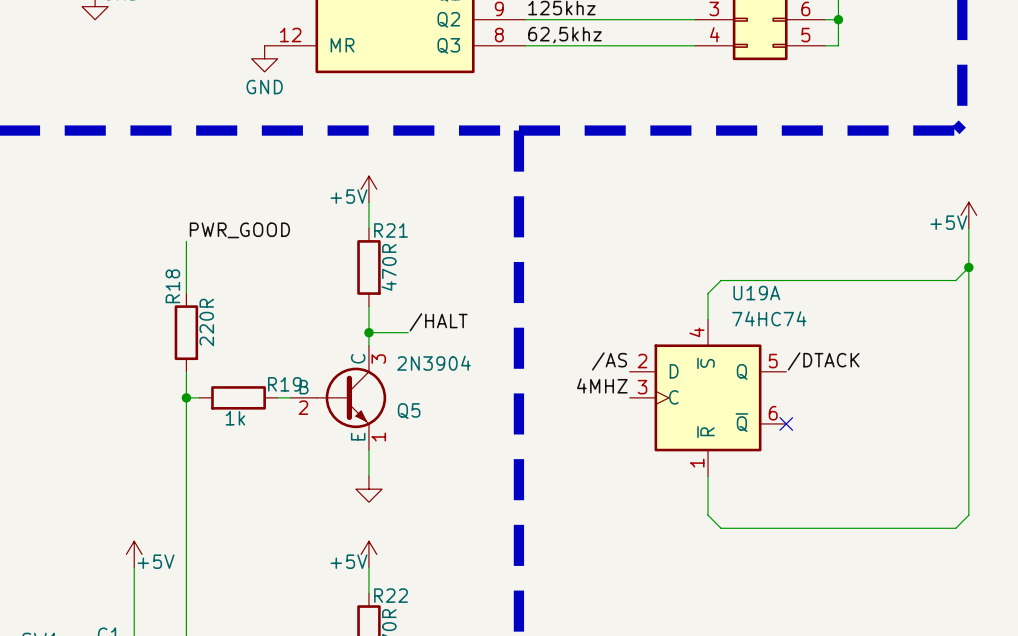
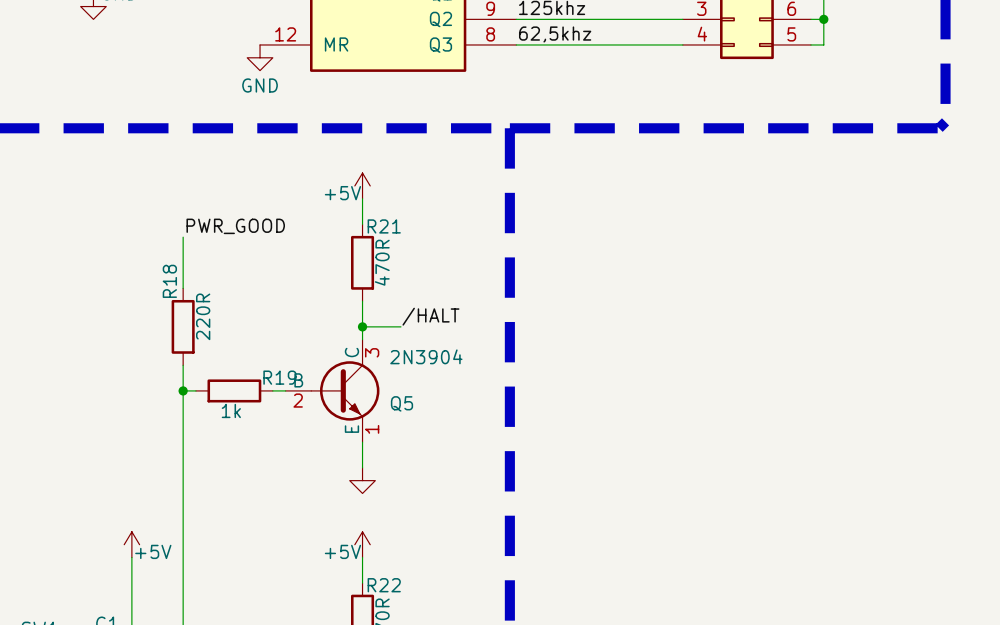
power symbol: +5V (968, 215) -> none
wire: (968, 228) (968, 515) (955, 528) (721, 528) (708, 515) (708, 476) -> none
wire: (968, 267) (955, 280) (721, 280) (708, 293) (708, 319) -> none
junction: (968, 267) -> none
label: /AS (609, 361) -> none
label: /DTACK (823, 361) -> none
label: 4MHZ (602, 385) -> none
U19A: 74HC74 (708, 397) -> none
no-connect mark: (786, 423) -> none

